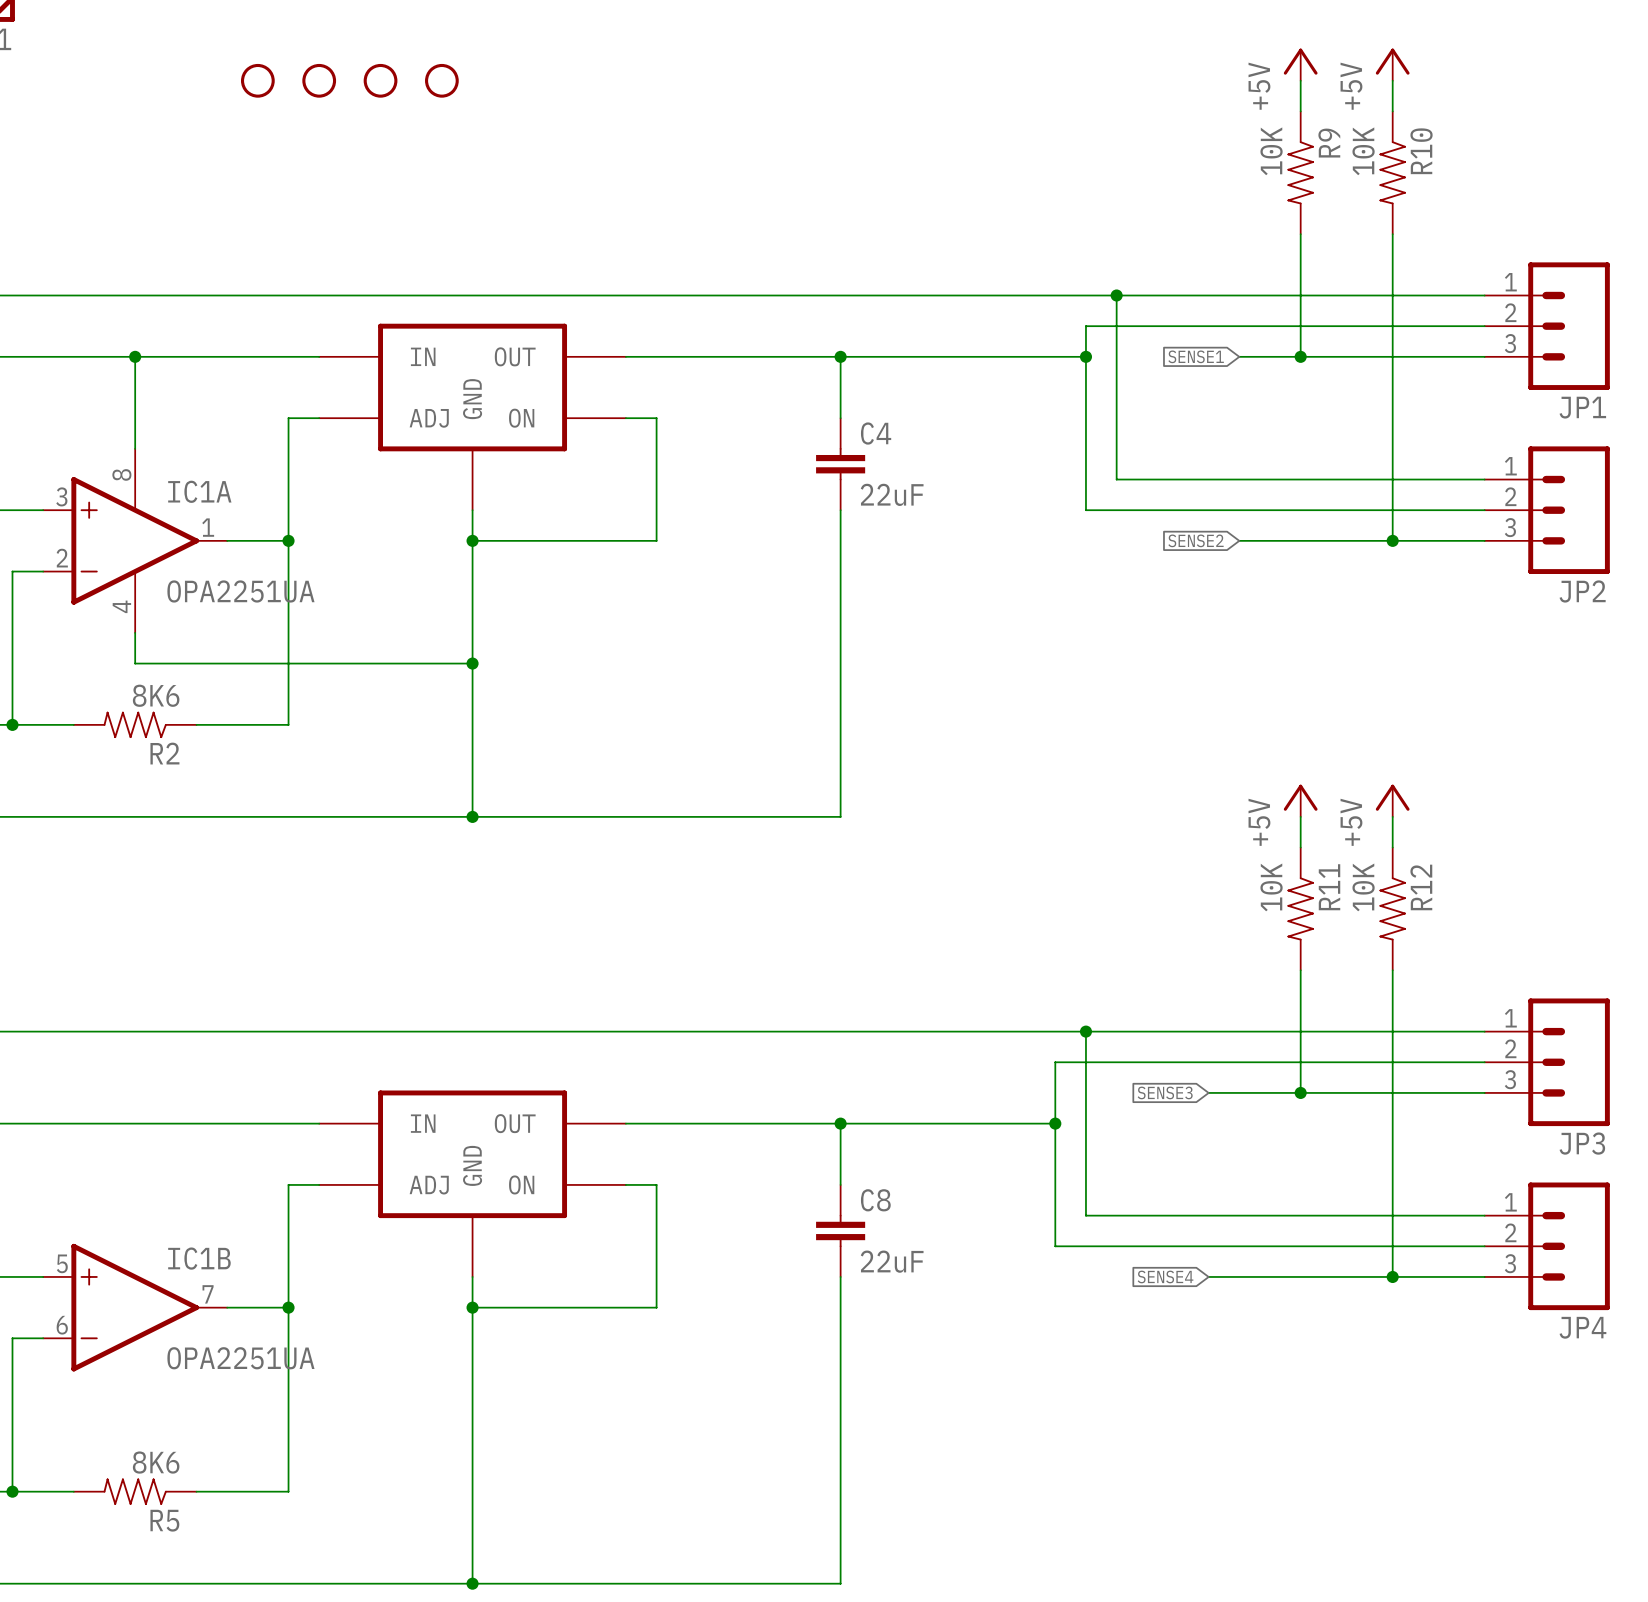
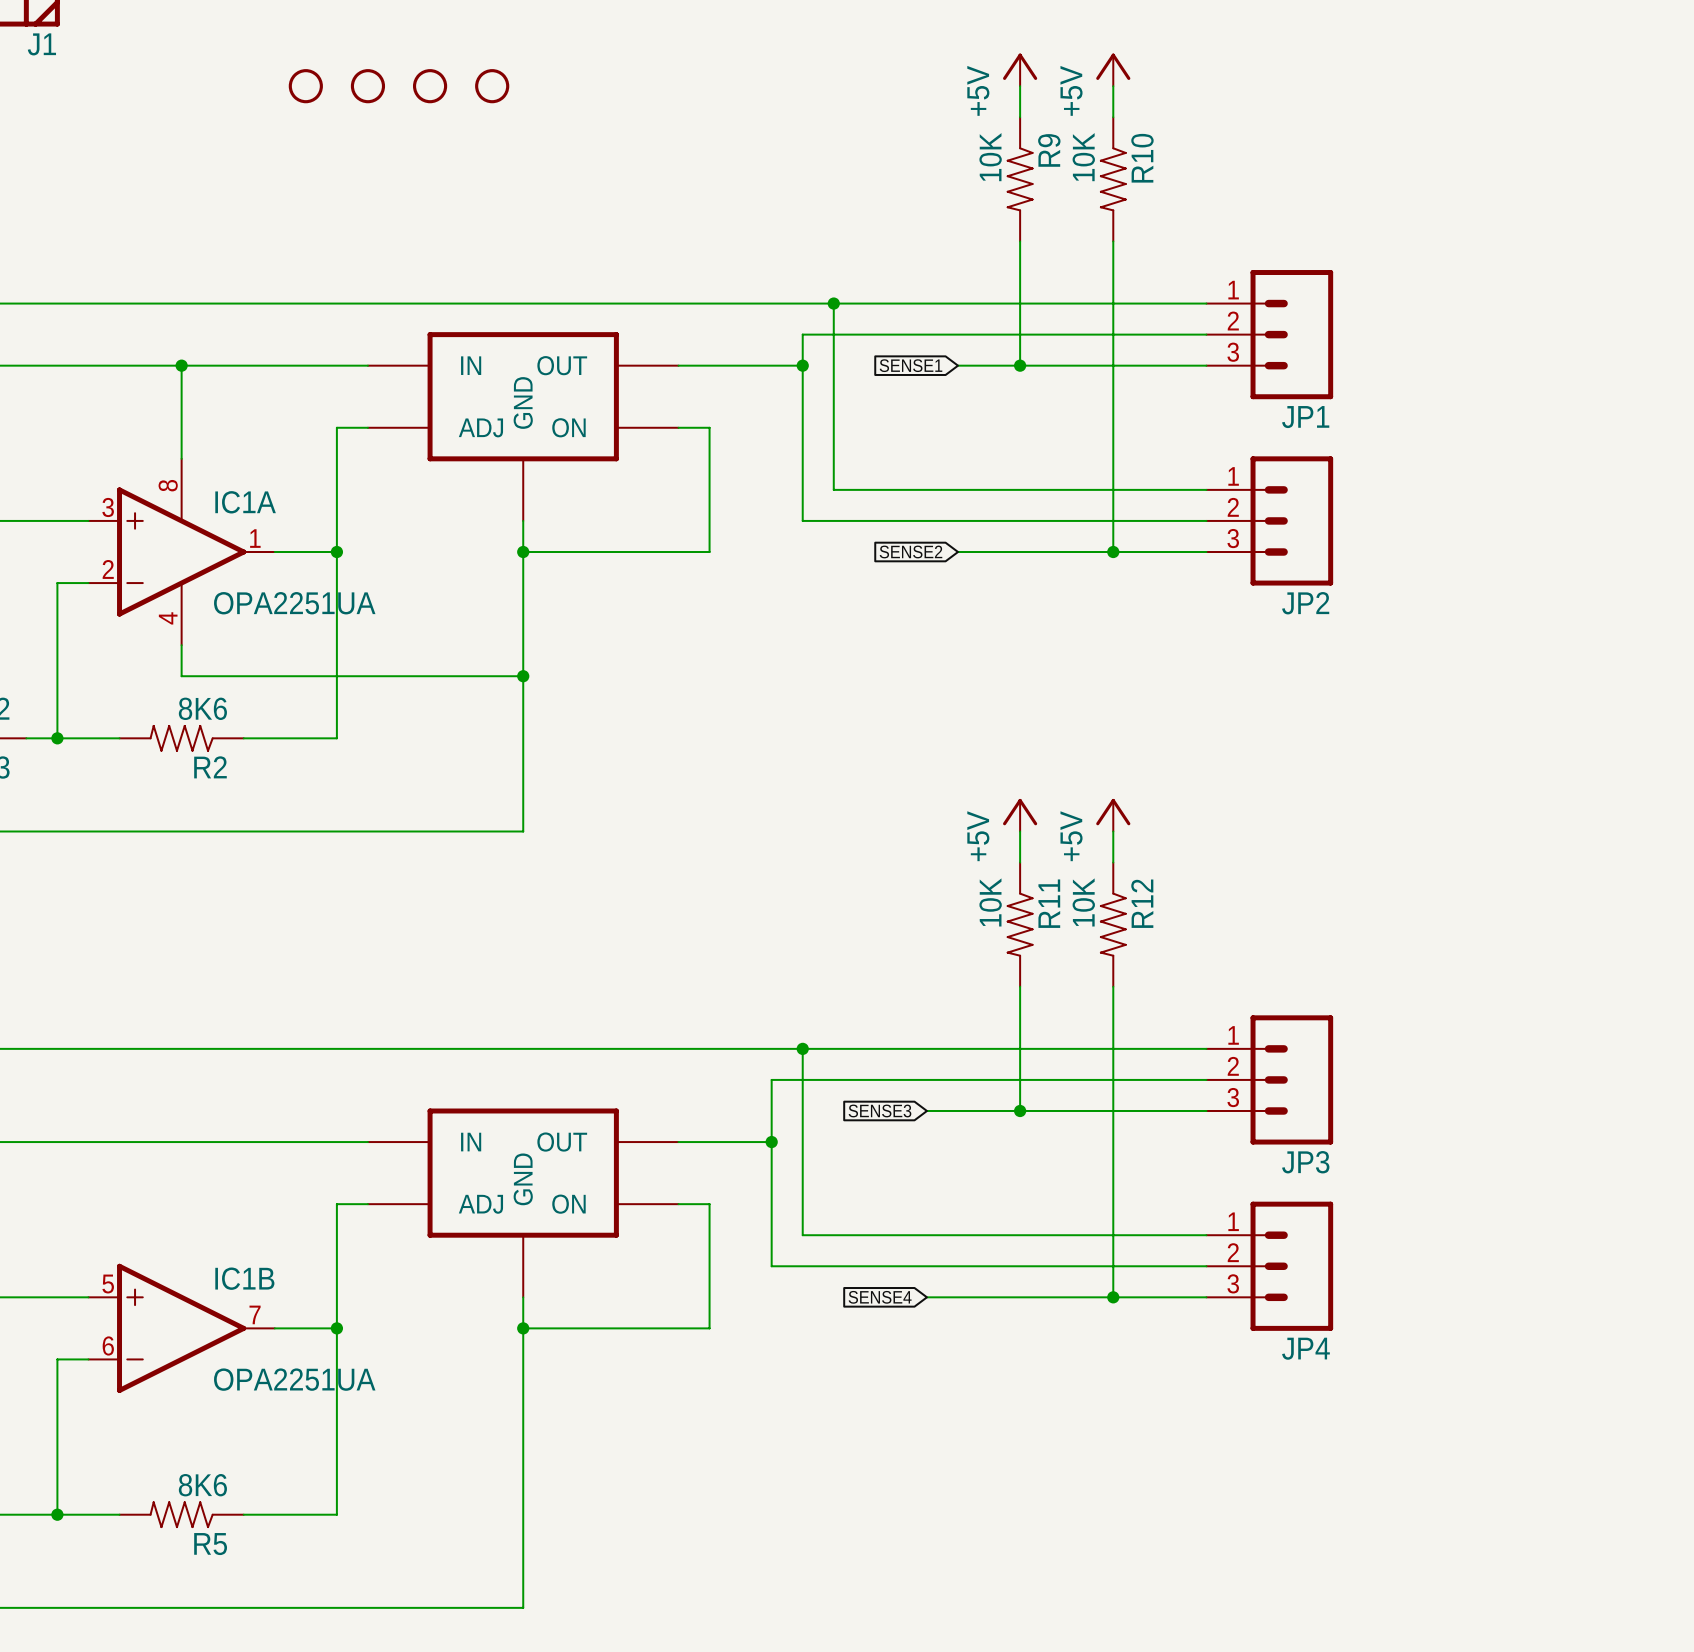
power symbol: none -> +5V (1020, 69)
power symbol: none -> +5V (1113, 69)
power symbol: +5V (1300, 64) -> none
power symbol: +5V (1392, 64) -> none
wire: none -> (1020, 86) (1020, 117)
wire: (1300, 80) (1300, 111) -> (1113, 86) (1113, 117)
wire: (1392, 80) (1392, 111) -> none
R9 position: (1300, 172) -> (1020, 179)
R10 position: (1392, 172) -> (1113, 179)
wire: none -> (1020, 241) (1020, 365)
wire: none -> (1113, 241) (1113, 552)
wire: (1300, 234) (1300, 356) -> none
wire: (1392, 234) (1392, 540) -> none
junction: none -> (833, 303)
wire: (1116, 295) (1116, 479) -> (833, 303) (833, 489) (1175, 489)
junction: (1116, 295) -> none
wire: (1147, 295) (1484, 295) -> none
wire: (1085, 326) (1085, 510) -> (1144, 334) (802, 334) (802, 520) (1144, 520)
wire: (1147, 326) (1484, 326) -> none
JP1 position: (1547, 326) -> (1269, 334)
wire: (748, 356) (901, 356) -> none
junction: none -> (802, 365)
wire: (840, 356) (840, 418) -> none
junction: (840, 356) -> none
global label: none -> SENSE1 (911, 365)
junction: none -> (1020, 365)
wire: none -> (1144, 365) (1206, 365)
junction: (1085, 356) -> none
global label: SENSE1 (1196, 356) -> none
wire: (1239, 356) (1484, 356) -> none
junction: (1300, 356) -> none
C4: 22uF (840, 464) -> none
wire: (1147, 479) (1484, 479) -> none
wire: (840, 510) (840, 816) (472, 816) -> none
wire: (1147, 510) (1484, 510) -> none
JP2 position: (1547, 510) -> (1269, 520)
global label: none -> SENSE2 (910, 551)
wire: none -> (958, 552) (1206, 552)
junction: none -> (1113, 552)
global label: SENSE2 (1195, 540) -> none
wire: (1239, 540) (1484, 540) -> none
junction: (1392, 540) -> none
power symbol: none -> +5V (1020, 815)
power symbol: none -> +5V (1113, 815)
power symbol: +5V (1300, 800) -> none
power symbol: +5V (1392, 800) -> none
junction: (472, 816) -> none
wire: none -> (1020, 831) (1020, 862)
wire: (1300, 816) (1300, 847) -> (1113, 831) (1113, 862)
wire: (1392, 816) (1392, 847) -> none
R11 position: (1300, 908) -> (1020, 924)
R12 position: (1392, 908) -> (1113, 924)
wire: none -> (1020, 986) (1020, 1110)
wire: none -> (1113, 986) (1113, 1079) (771, 1079) (771, 1266) (1113, 1266) (1113, 1297)
wire: (1300, 970) (1300, 1092) -> none
wire: (1392, 970) (1392, 1276) -> none
junction: none -> (802, 1048)
wire: (1085, 1031) (1085, 1215) -> (802, 1048) (802, 1235) (1144, 1235)
junction: (1085, 1031) -> none
wire: (1147, 1031) (1484, 1031) -> none
wire: (1147, 1062) (1484, 1062) -> none
JP3 position: (1547, 1062) -> (1269, 1079)
global label: none -> SENSE3 (879, 1110)
wire: none -> (926, 1110) (1206, 1110)
junction: none -> (1020, 1110)
global label: SENSE3 (1165, 1092) -> none
wire: (1208, 1092) (1484, 1092) -> none
junction: (1300, 1092) -> none
wire: (717, 1123) (1055, 1123) -> none
junction: none -> (771, 1142)
wire: (840, 1123) (840, 1184) -> none
junction: (840, 1123) -> none
junction: (1055, 1123) -> none
wire: (1147, 1215) (1484, 1215) -> none
C8: 22uF (840, 1230) -> none
wire: (1147, 1246) (1484, 1246) -> none
JP4 position: (1547, 1246) -> (1269, 1266)
global label: none -> SENSE4 (880, 1297)
wire: (840, 1276) (840, 1583) (472, 1583) -> none
wire: none -> (926, 1297) (1206, 1297)
junction: none -> (1113, 1297)
global label: SENSE4 (1165, 1276) -> none
wire: (1208, 1276) (1484, 1276) -> none
junction: (1392, 1276) -> none
junction: (472, 1583) -> none

